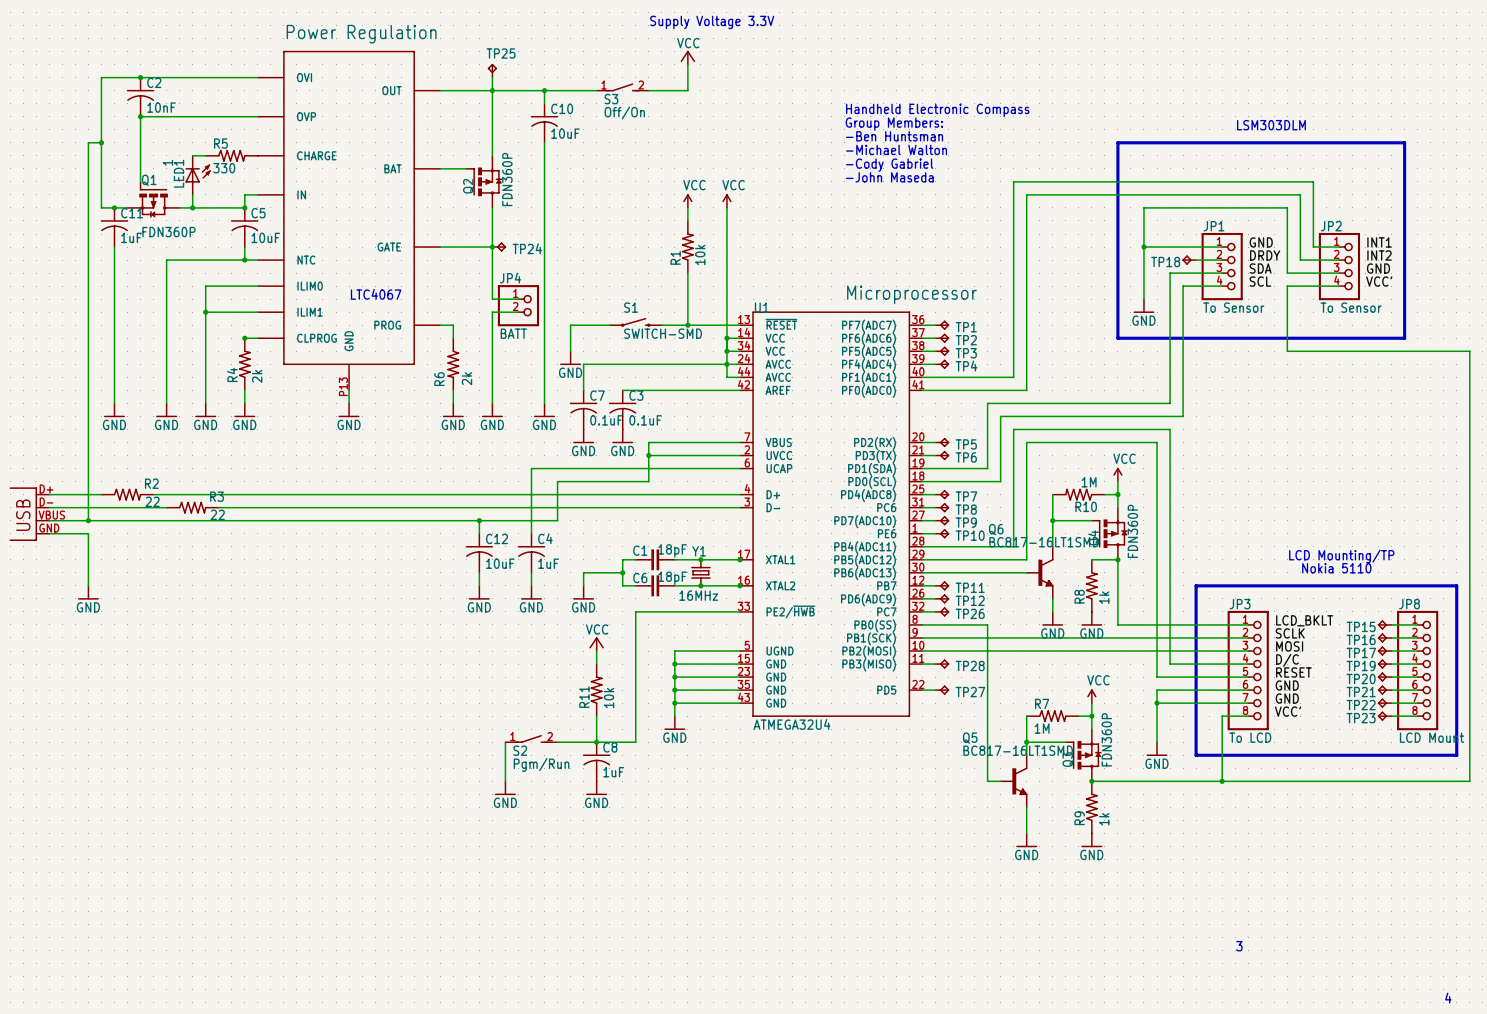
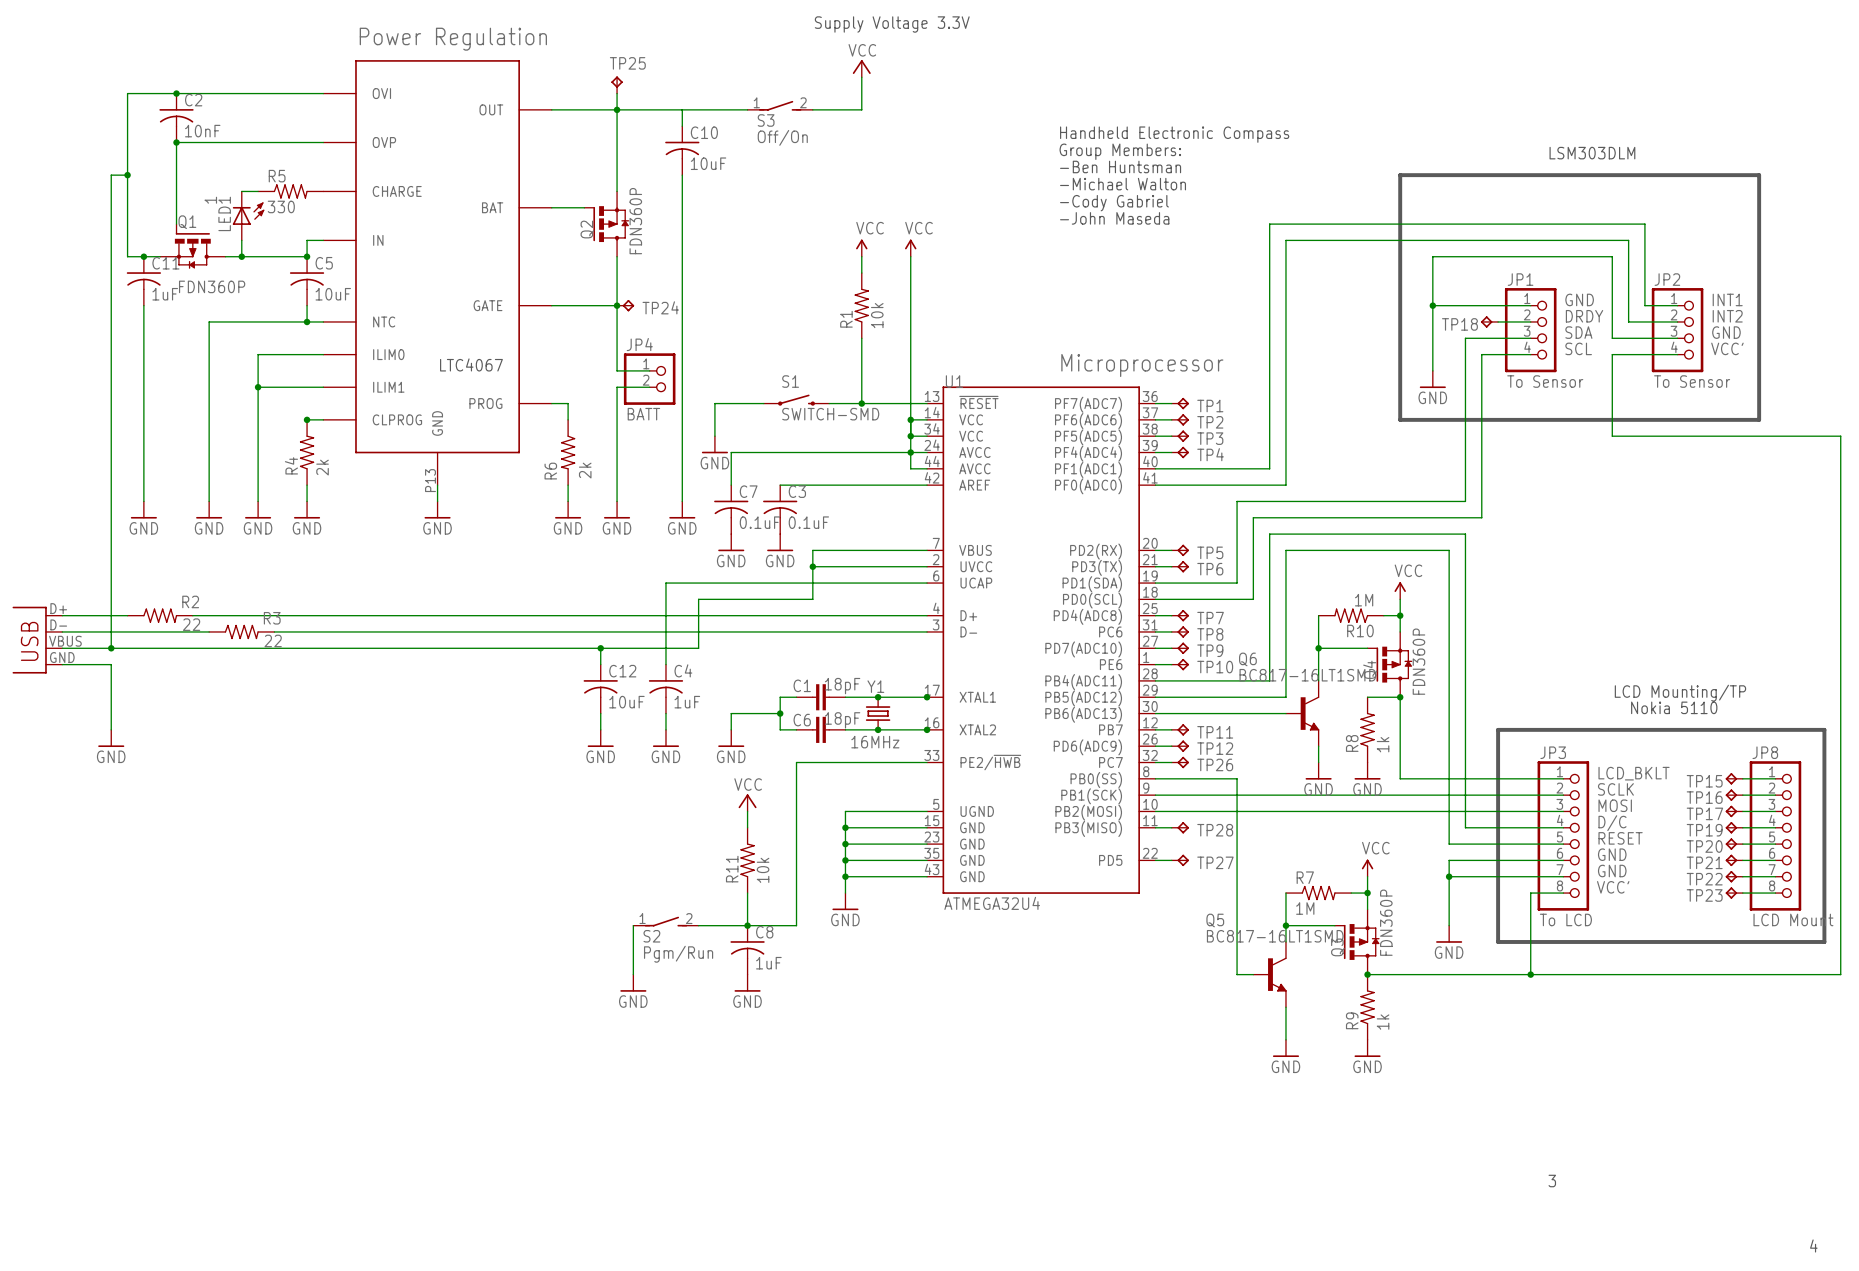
junction: (544, 90) -> none

